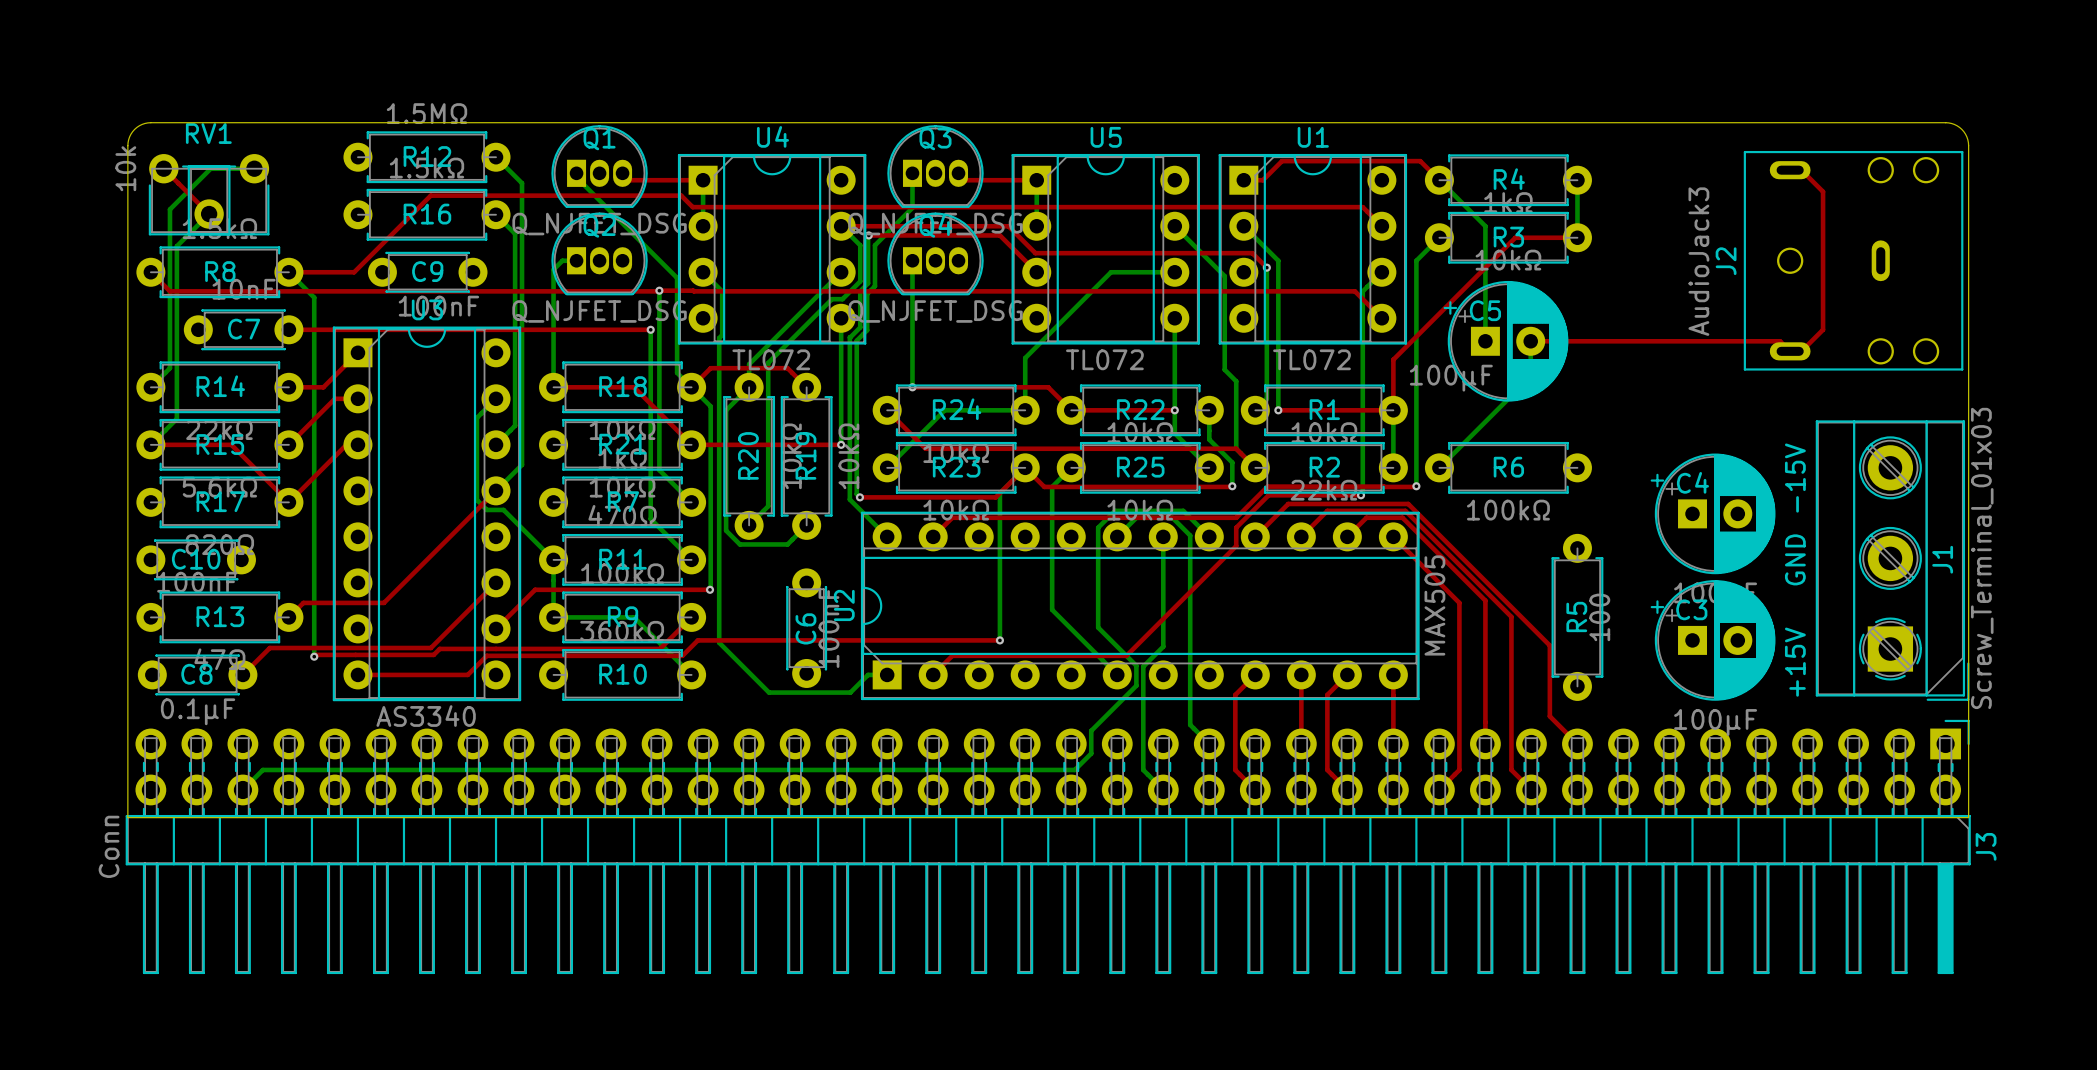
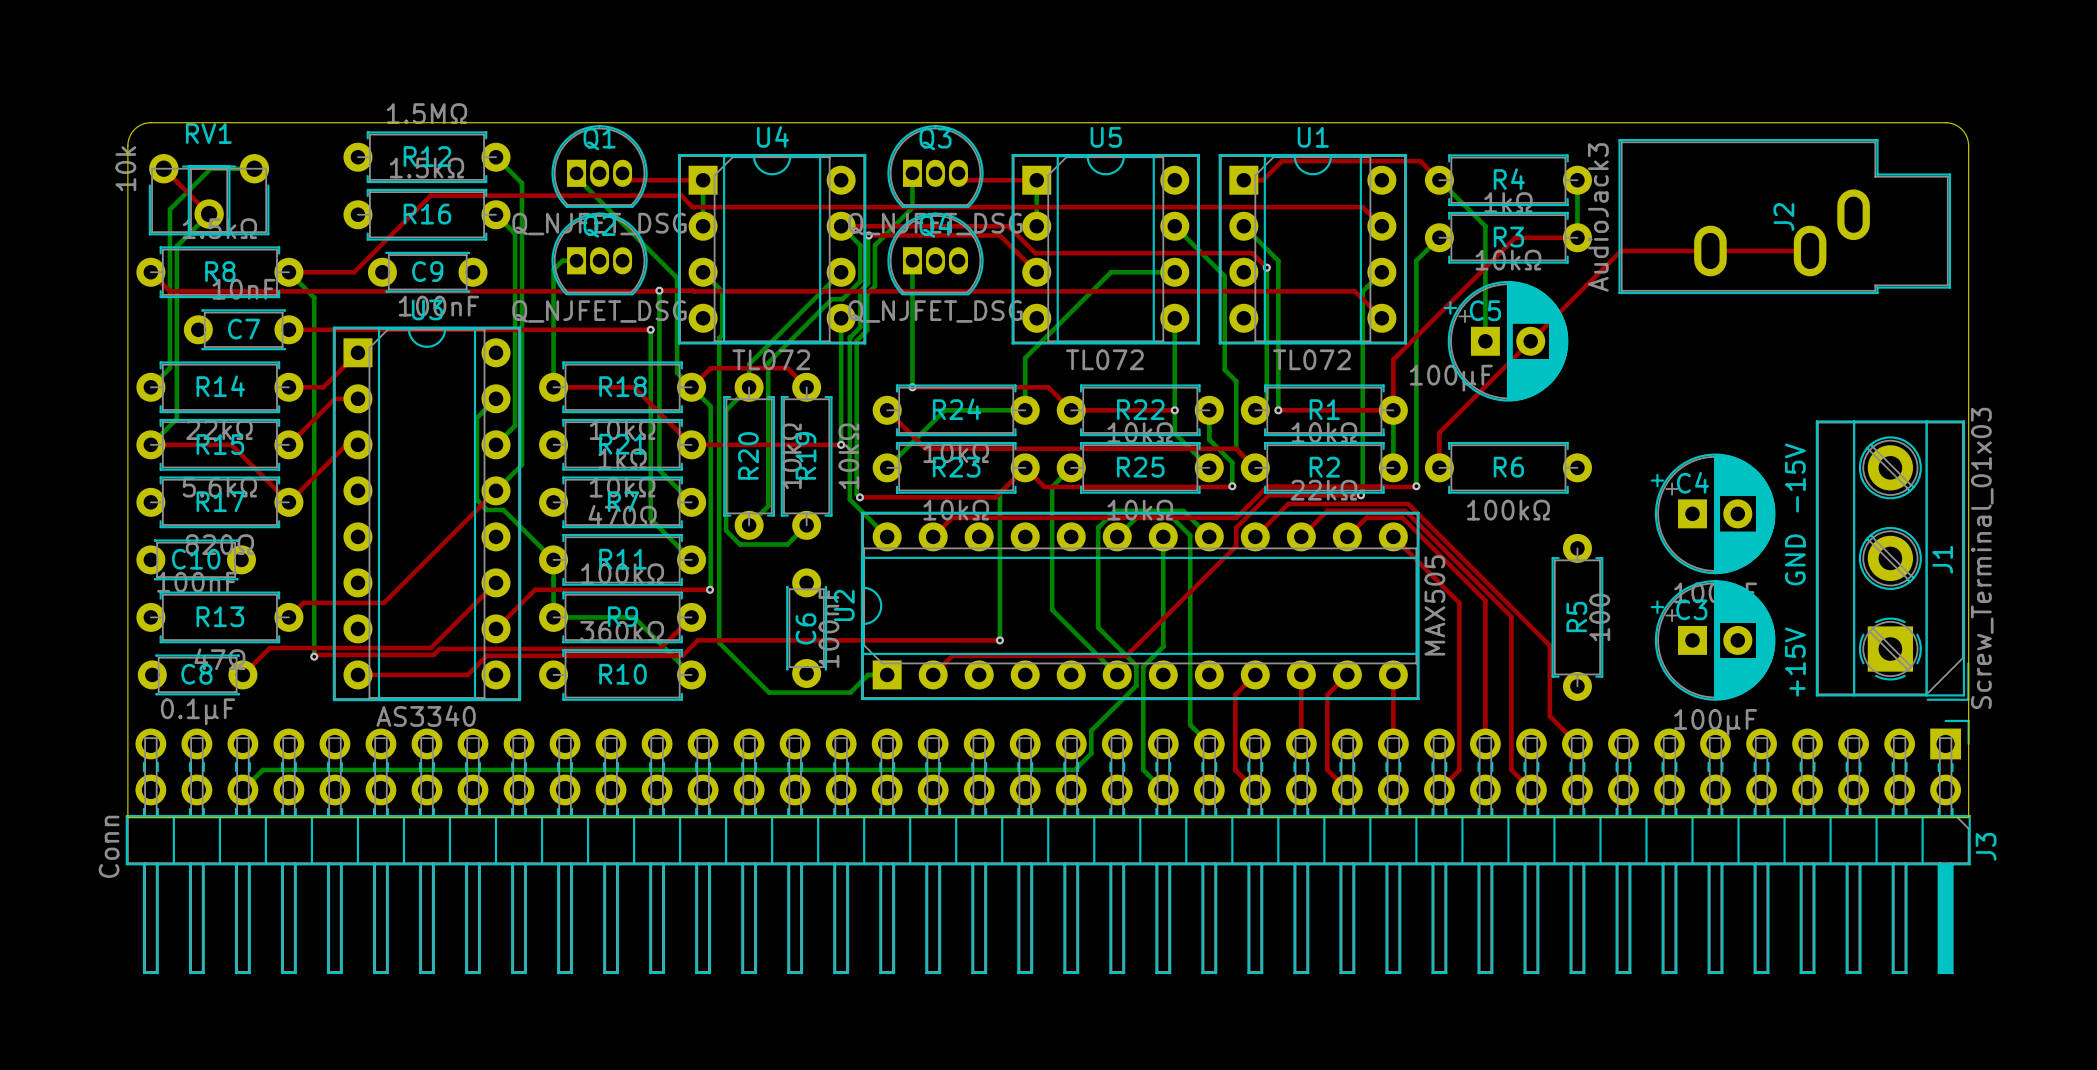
J2 footprint: [1743, 150, 1964, 371] -> [1618, 139, 1952, 295]
top track: (1790, 170) (1801, 170) (1823, 191) (1823, 329) (1801, 351) (1790, 351) (1780, 341) (1530, 341) -> none
top track: none -> (1810, 250) (1621, 250) (1439, 432) (1439, 467)
J2 name position: J2 (1726, 261) -> J2 (1783, 216)
bottom track: (1530, 341) (1530, 376) (1439, 467) -> none

